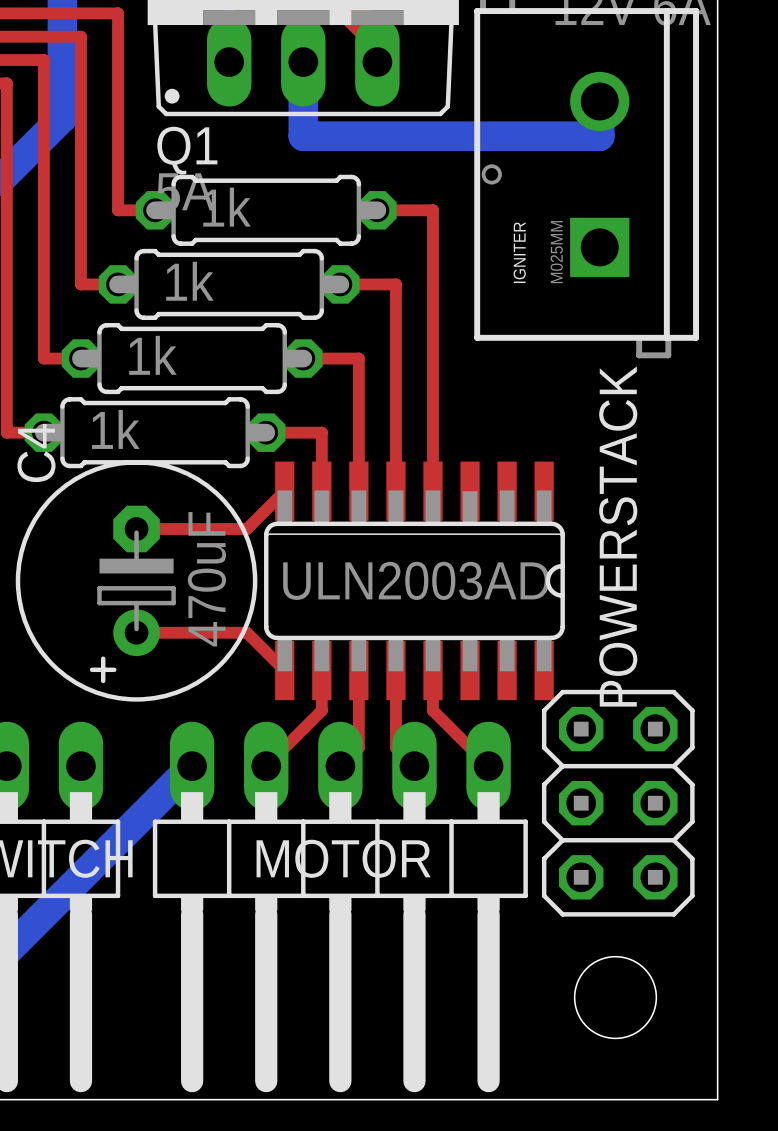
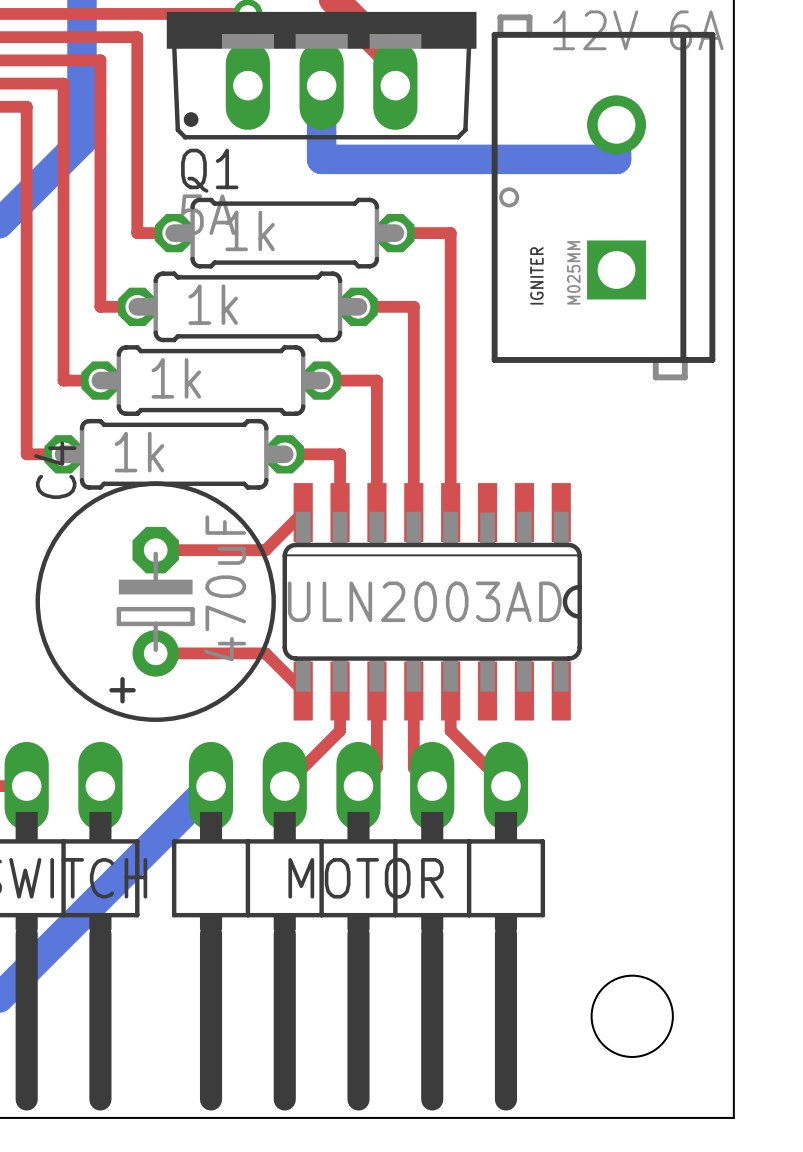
POWERSTACK: (618, 803) -> none

